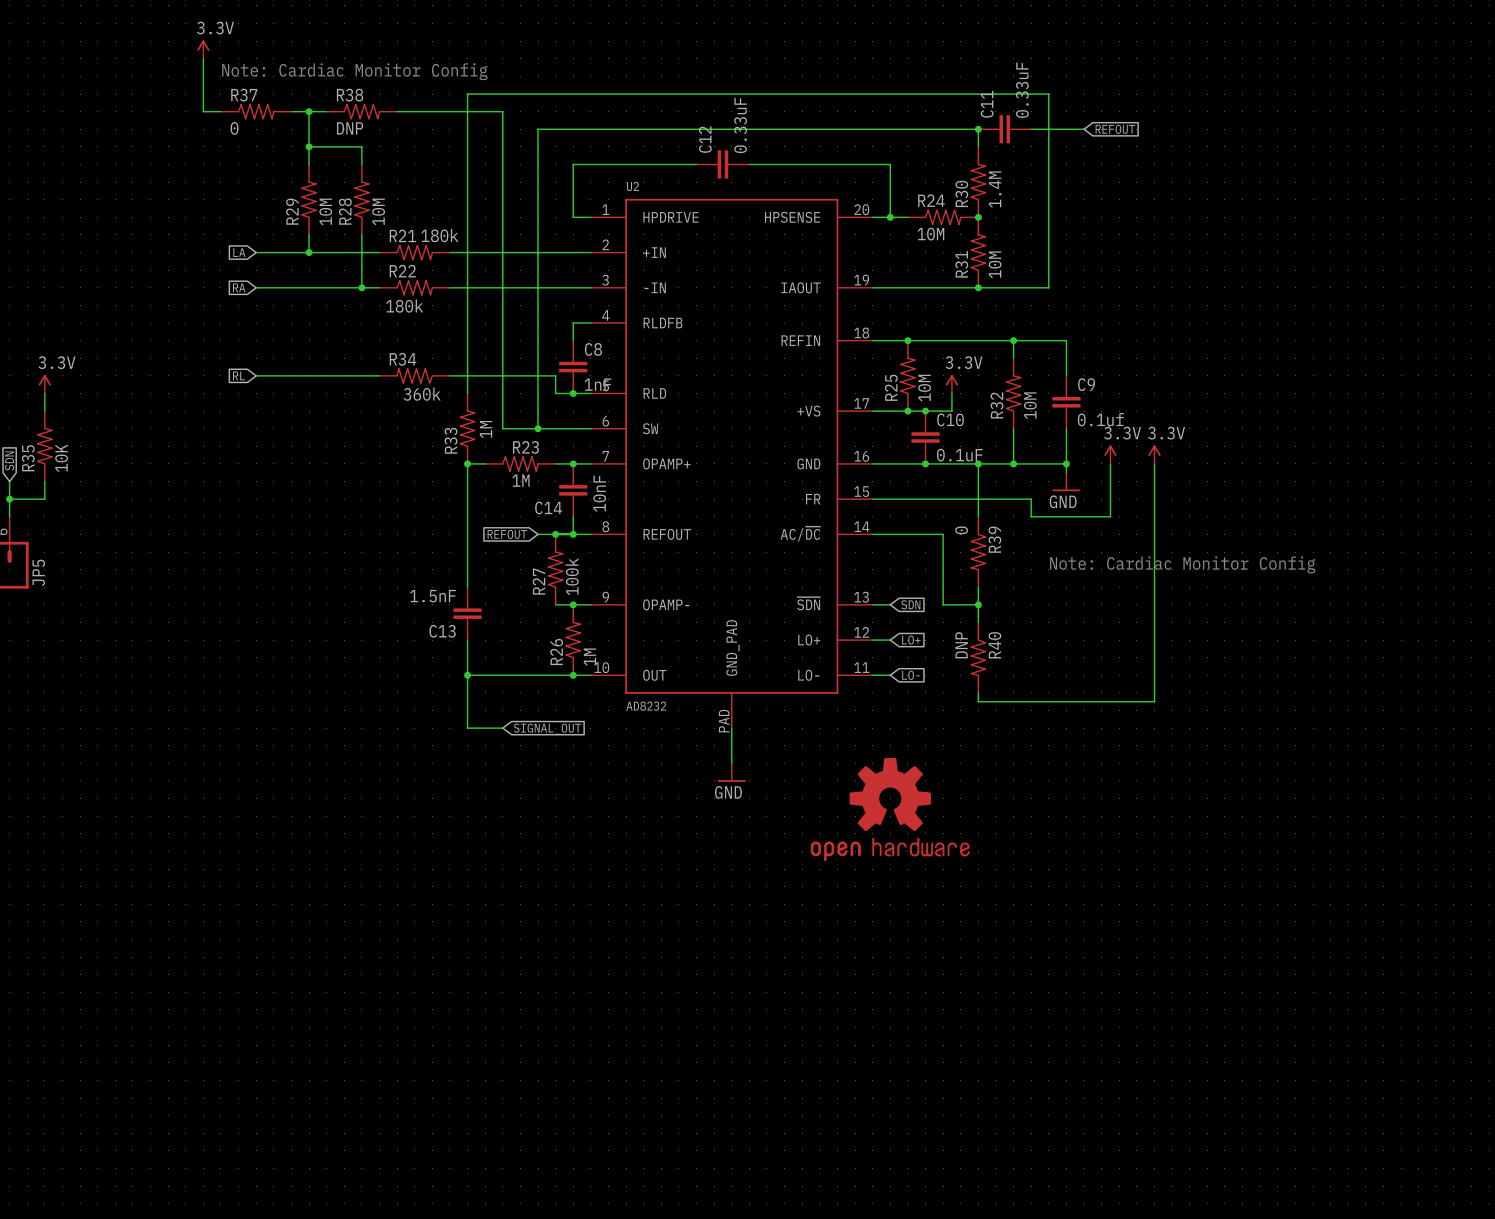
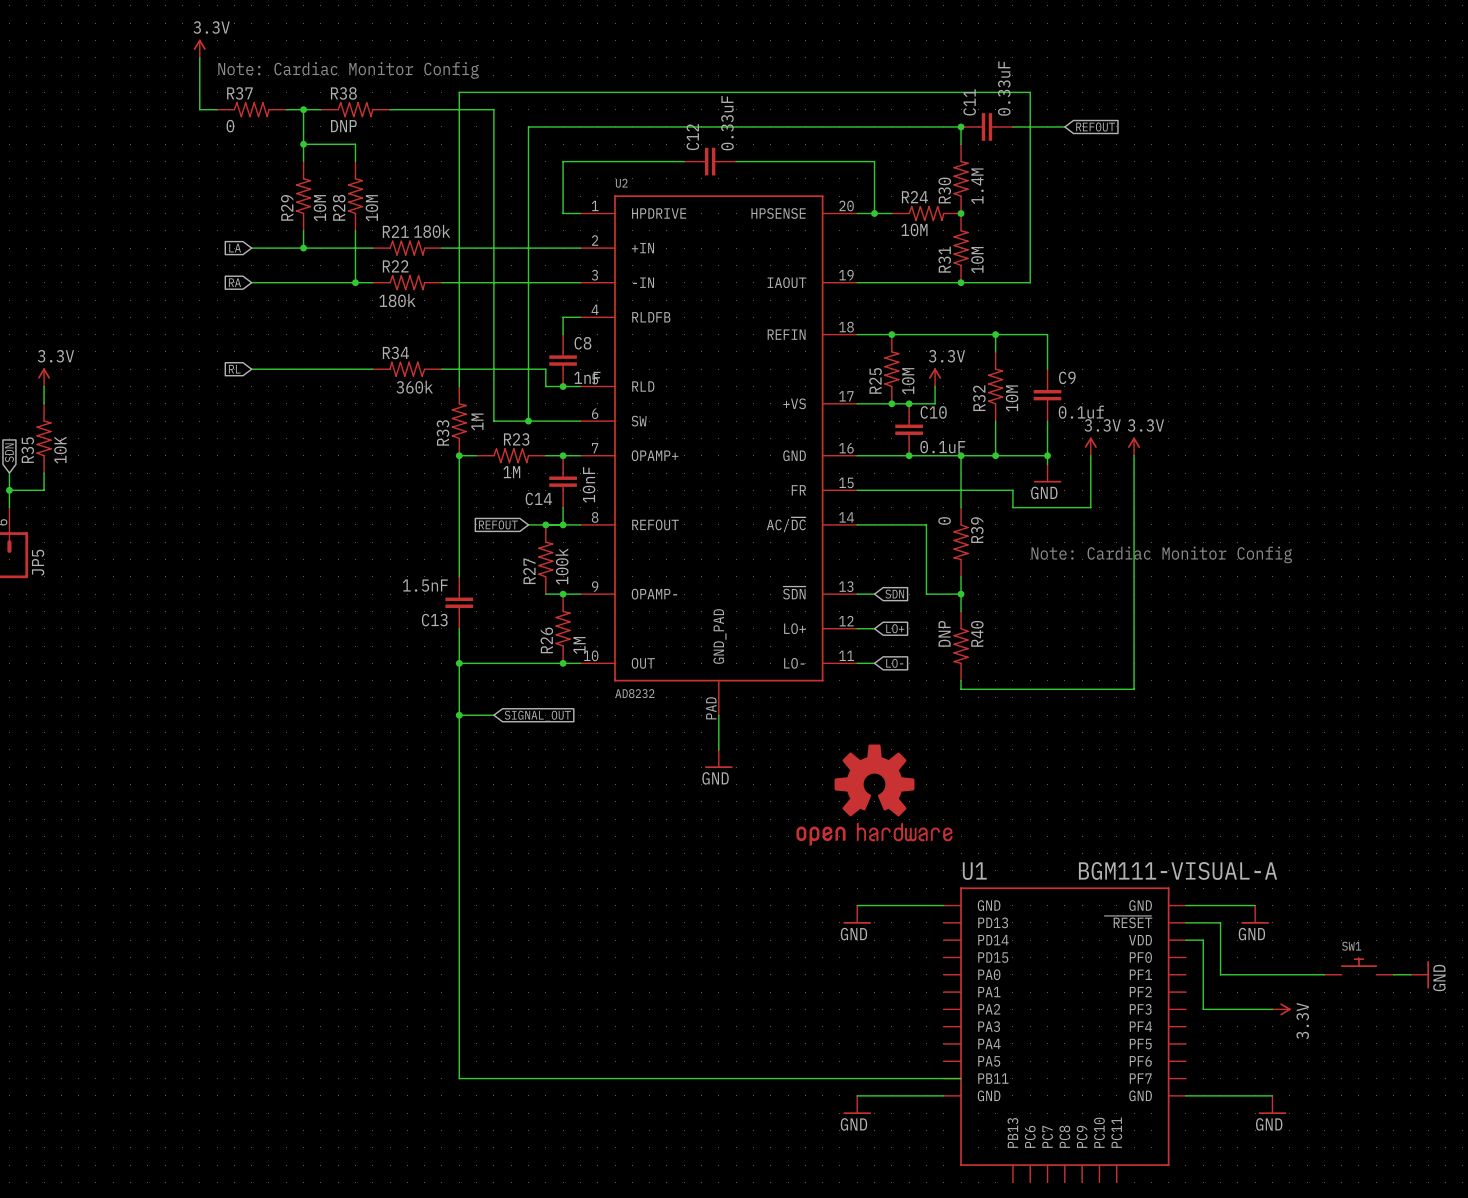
wire: none -> (459, 715) (459, 1078) (961, 1078)
junction: none -> (459, 715)
wire: none -> (857, 905) (943, 905)
wire: none -> (1185, 905) (1255, 905)
power symbol: none -> GND (857, 914)
power symbol: none -> GND (1255, 914)
wire: none -> (1185, 922) (1220, 922) (1220, 974) (1324, 974)
wire: none -> (1185, 940) (1203, 940) (1203, 1009) (1272, 1009)
SW1: none -> (1358, 966)
wire: none -> (1393, 974) (1410, 974)
power symbol: none -> GND (1419, 974)
power symbol: none -> 3.3V (1281, 1009)
U1: none -> BGM111-VISUAL-A (1064, 1034)
wire: none -> (857, 1095) (943, 1095)
wire: none -> (1185, 1095) (1272, 1095)
power symbol: none -> GND (857, 1104)
power symbol: none -> GND (1272, 1104)

